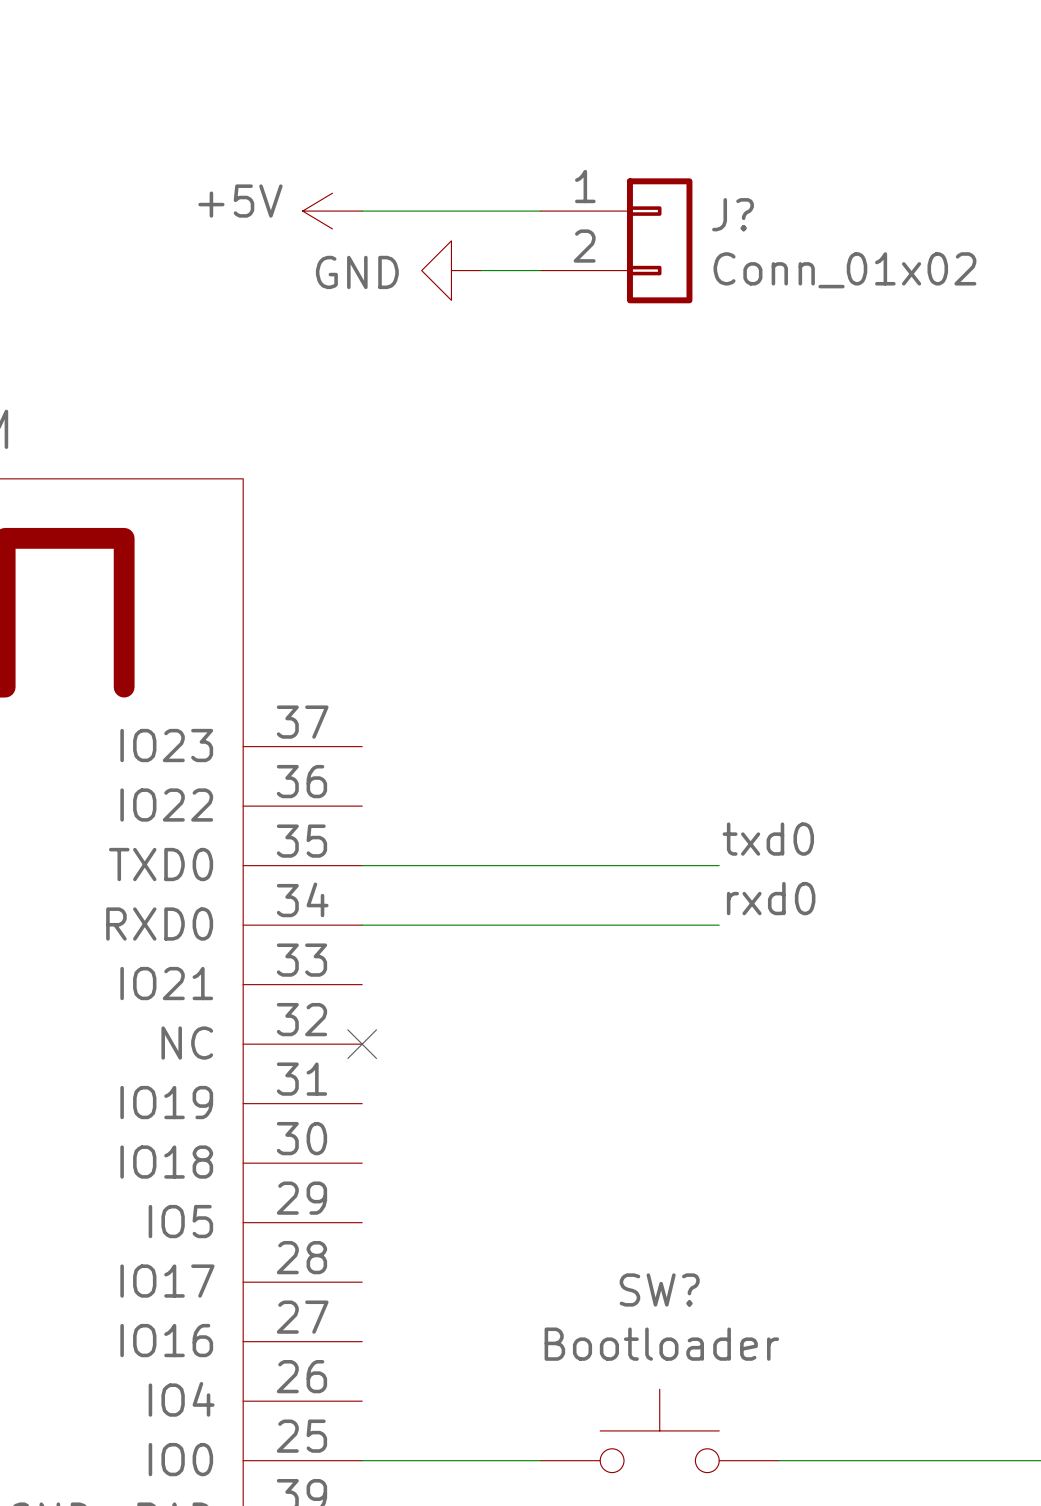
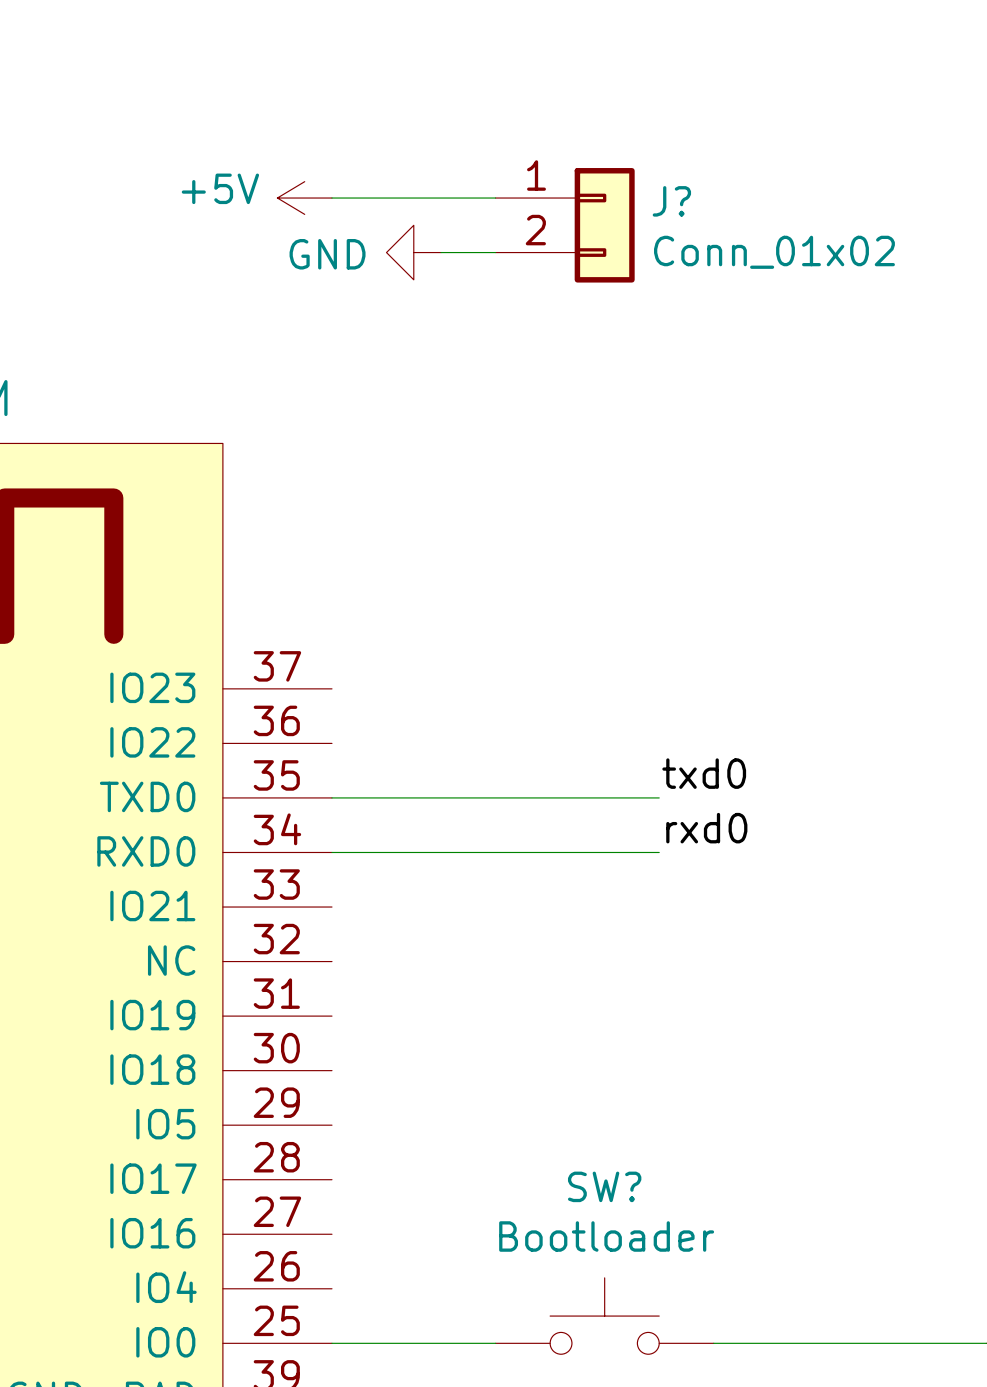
no-connect mark: (362, 1044) -> none

